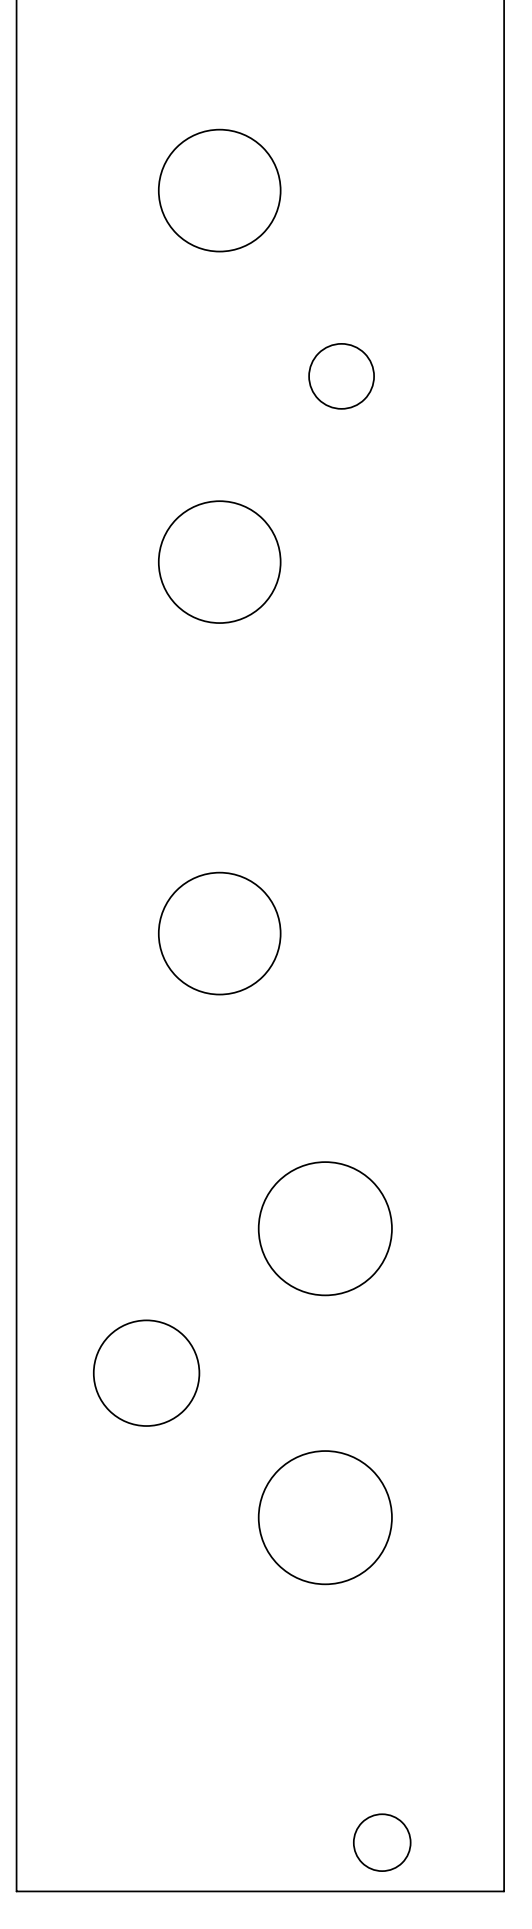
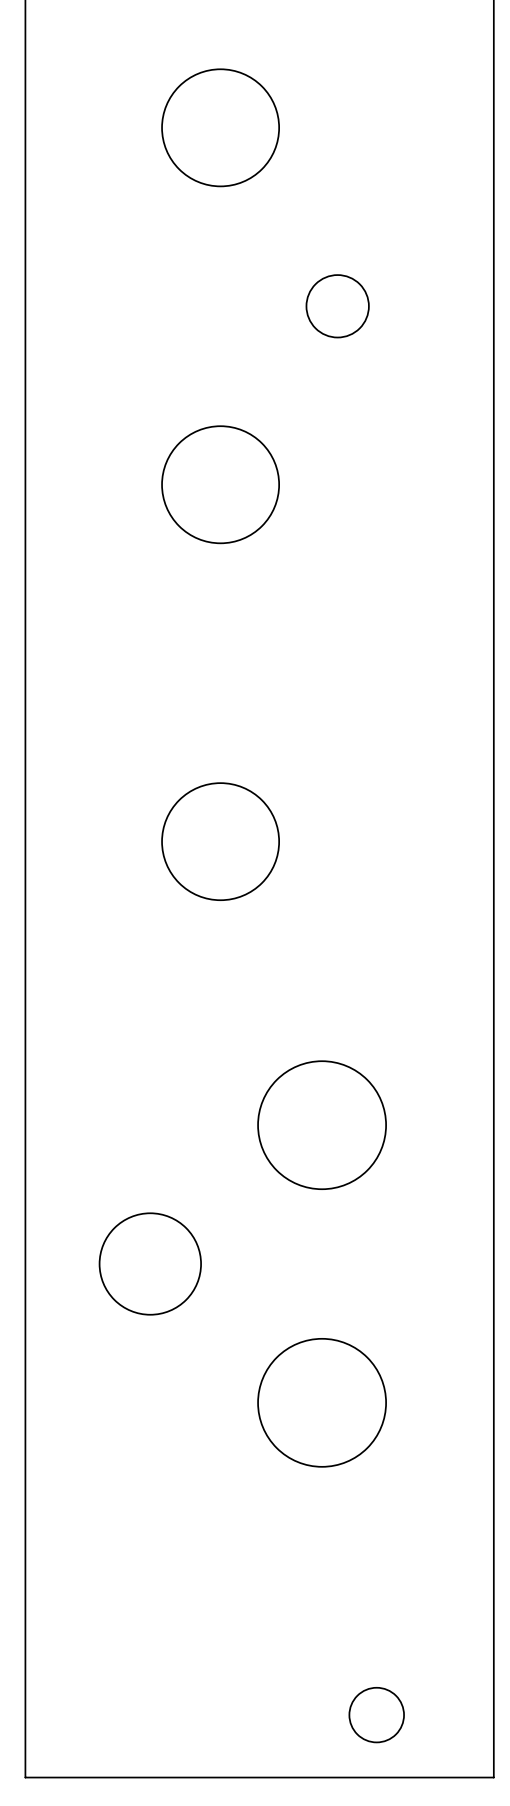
board edge: (504, 1891) (16, 1891) -> (493, 1761) (493, 1777) (25, 1777) (25, 1761)

